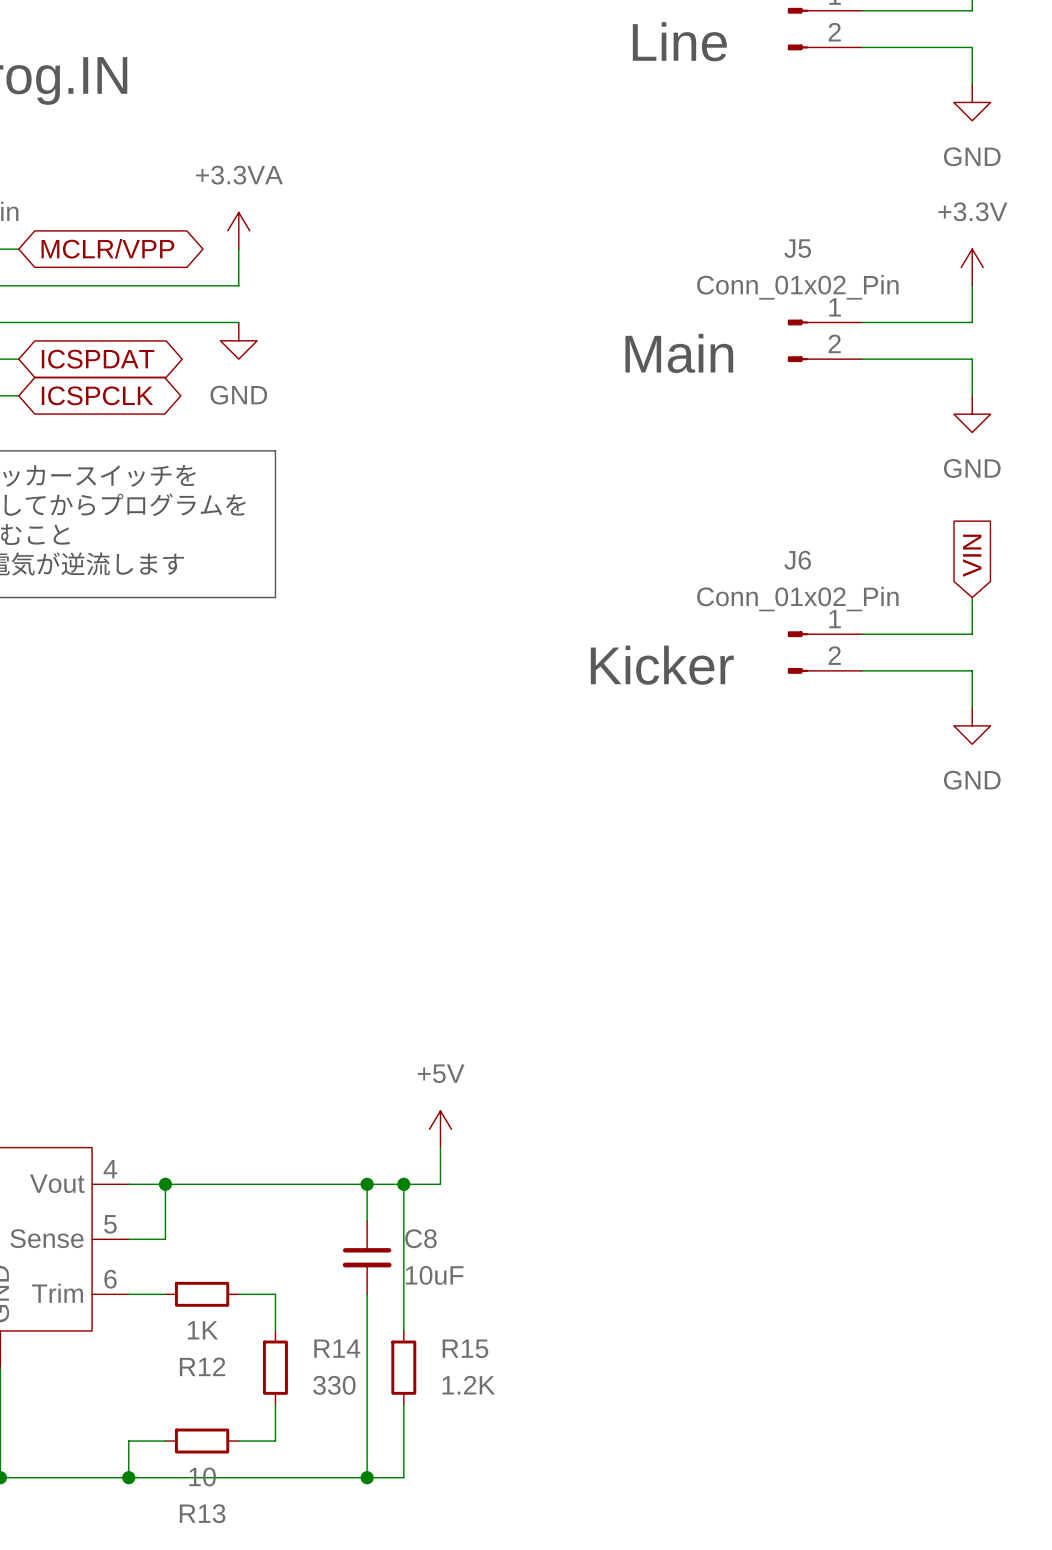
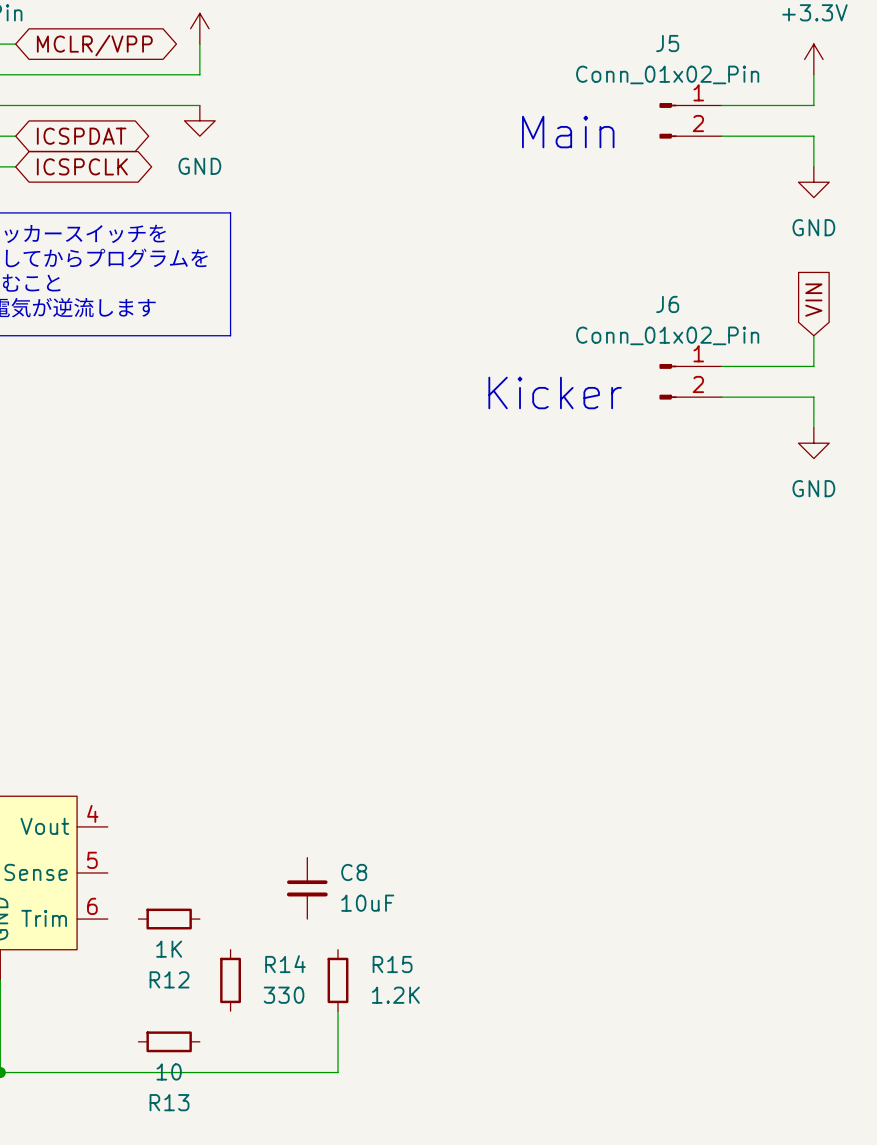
power symbol: +5V (440, 1129) -> none
wire: (440, 1147) (440, 1184) (128, 1184) -> none
wire: (165, 1184) (165, 1239) (128, 1239) -> none
junction: (165, 1184) -> none
wire: (367, 1184) (367, 1220) -> none
junction: (367, 1184) -> none
wire: (403, 1184) (403, 1331) -> none
junction: (403, 1184) -> none
wire: (128, 1294) (165, 1294) -> none
wire: (238, 1294) (275, 1294) (275, 1331) -> none
wire: (367, 1294) (367, 1477) -> none
wire: (275, 1404) (275, 1441) (238, 1441) -> none
wire: (165, 1441) (128, 1441) (128, 1477) -> none
junction: (128, 1477) -> none
junction: (367, 1477) -> none

